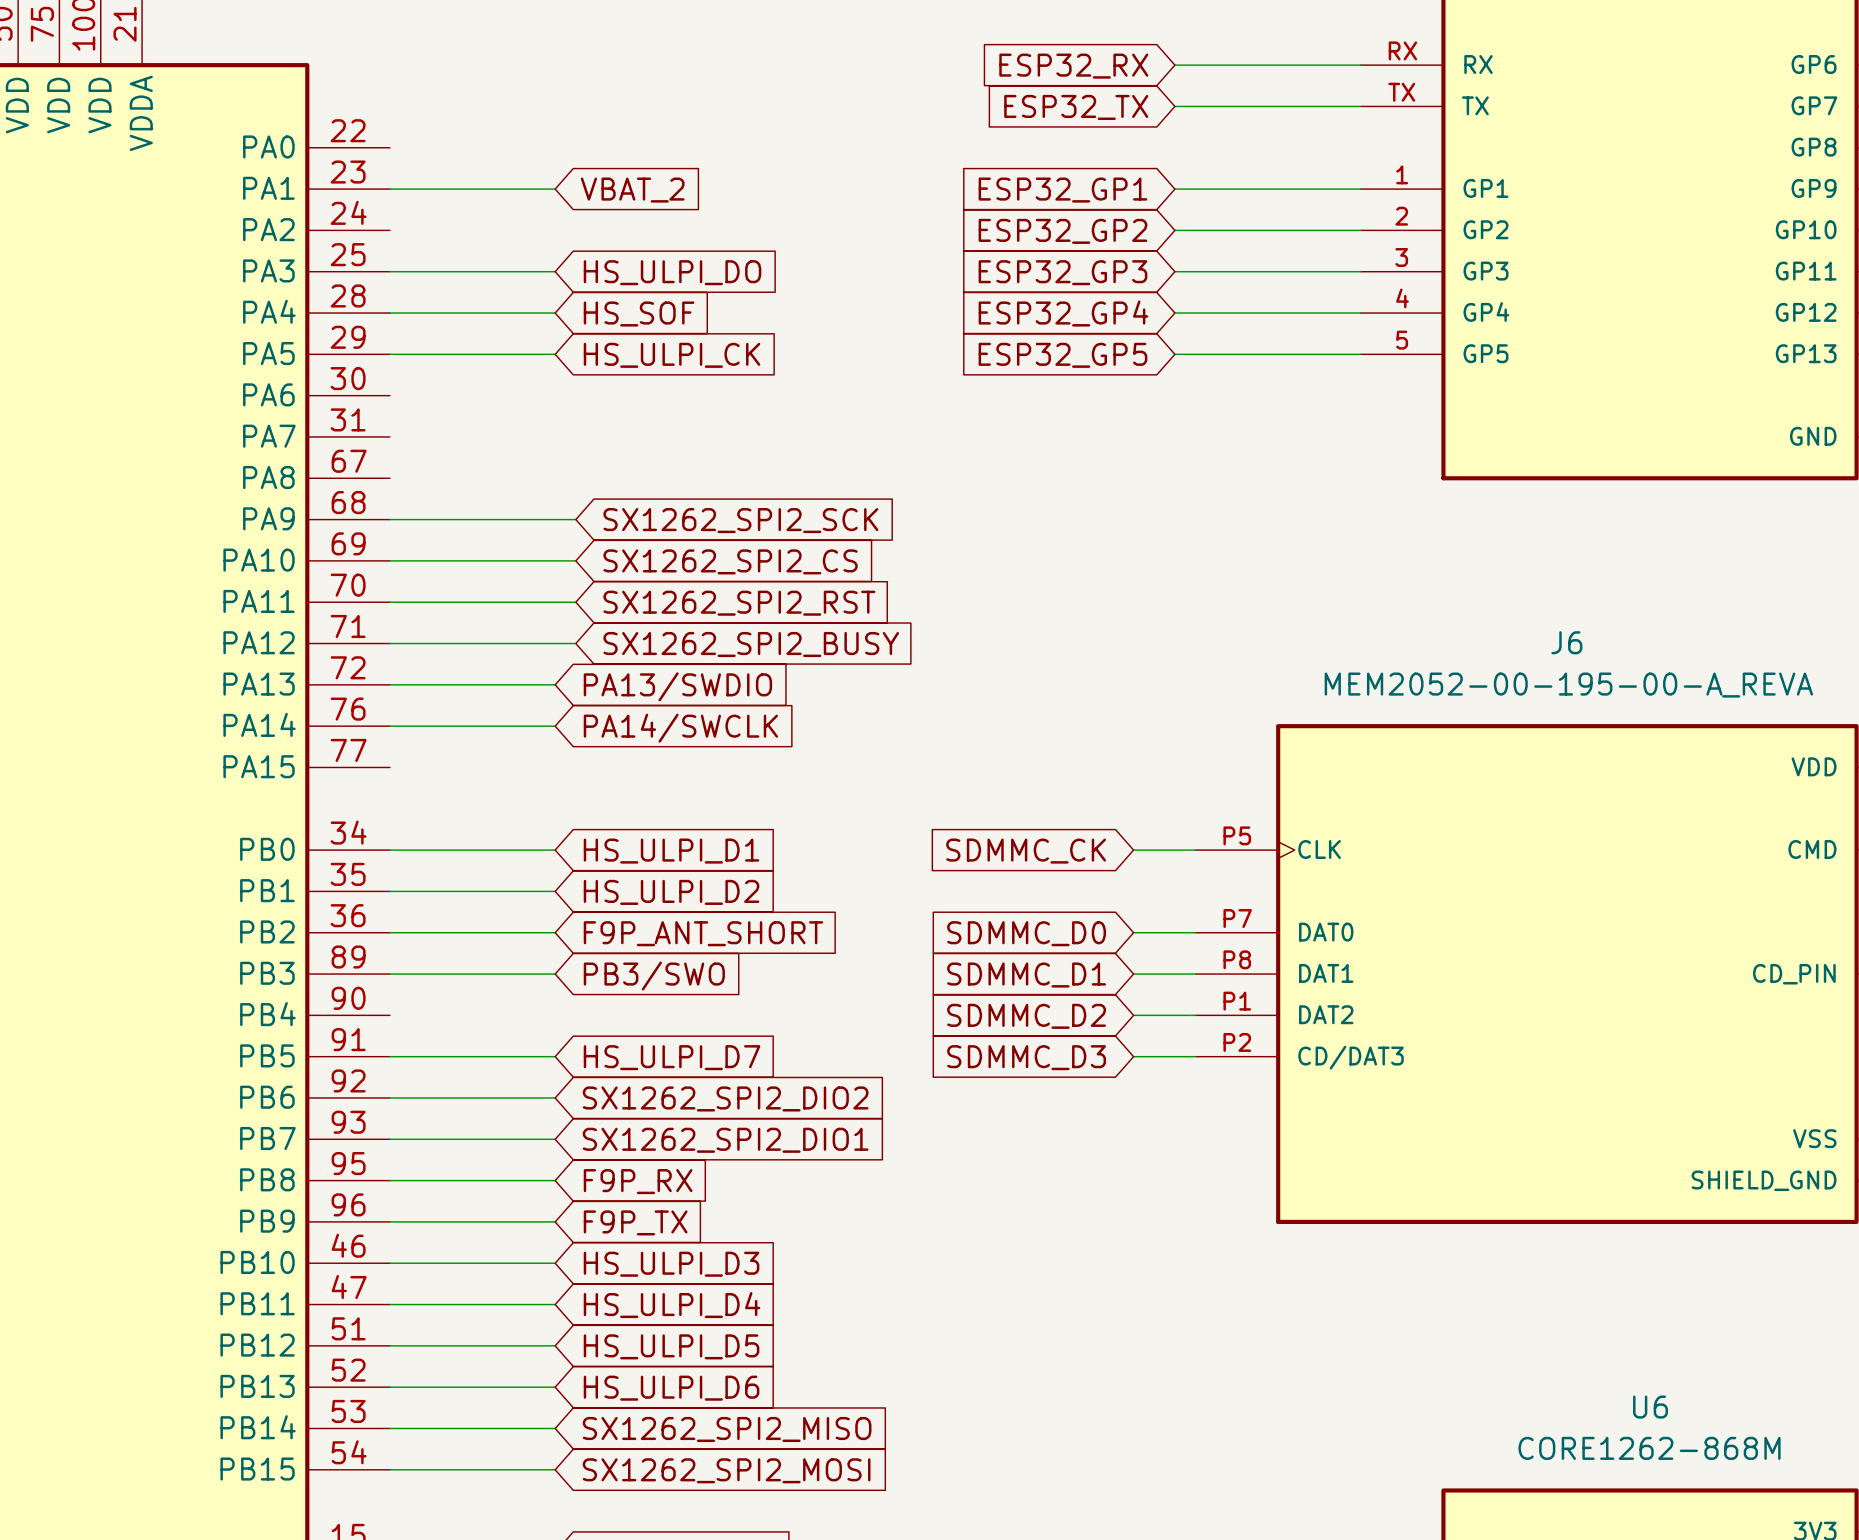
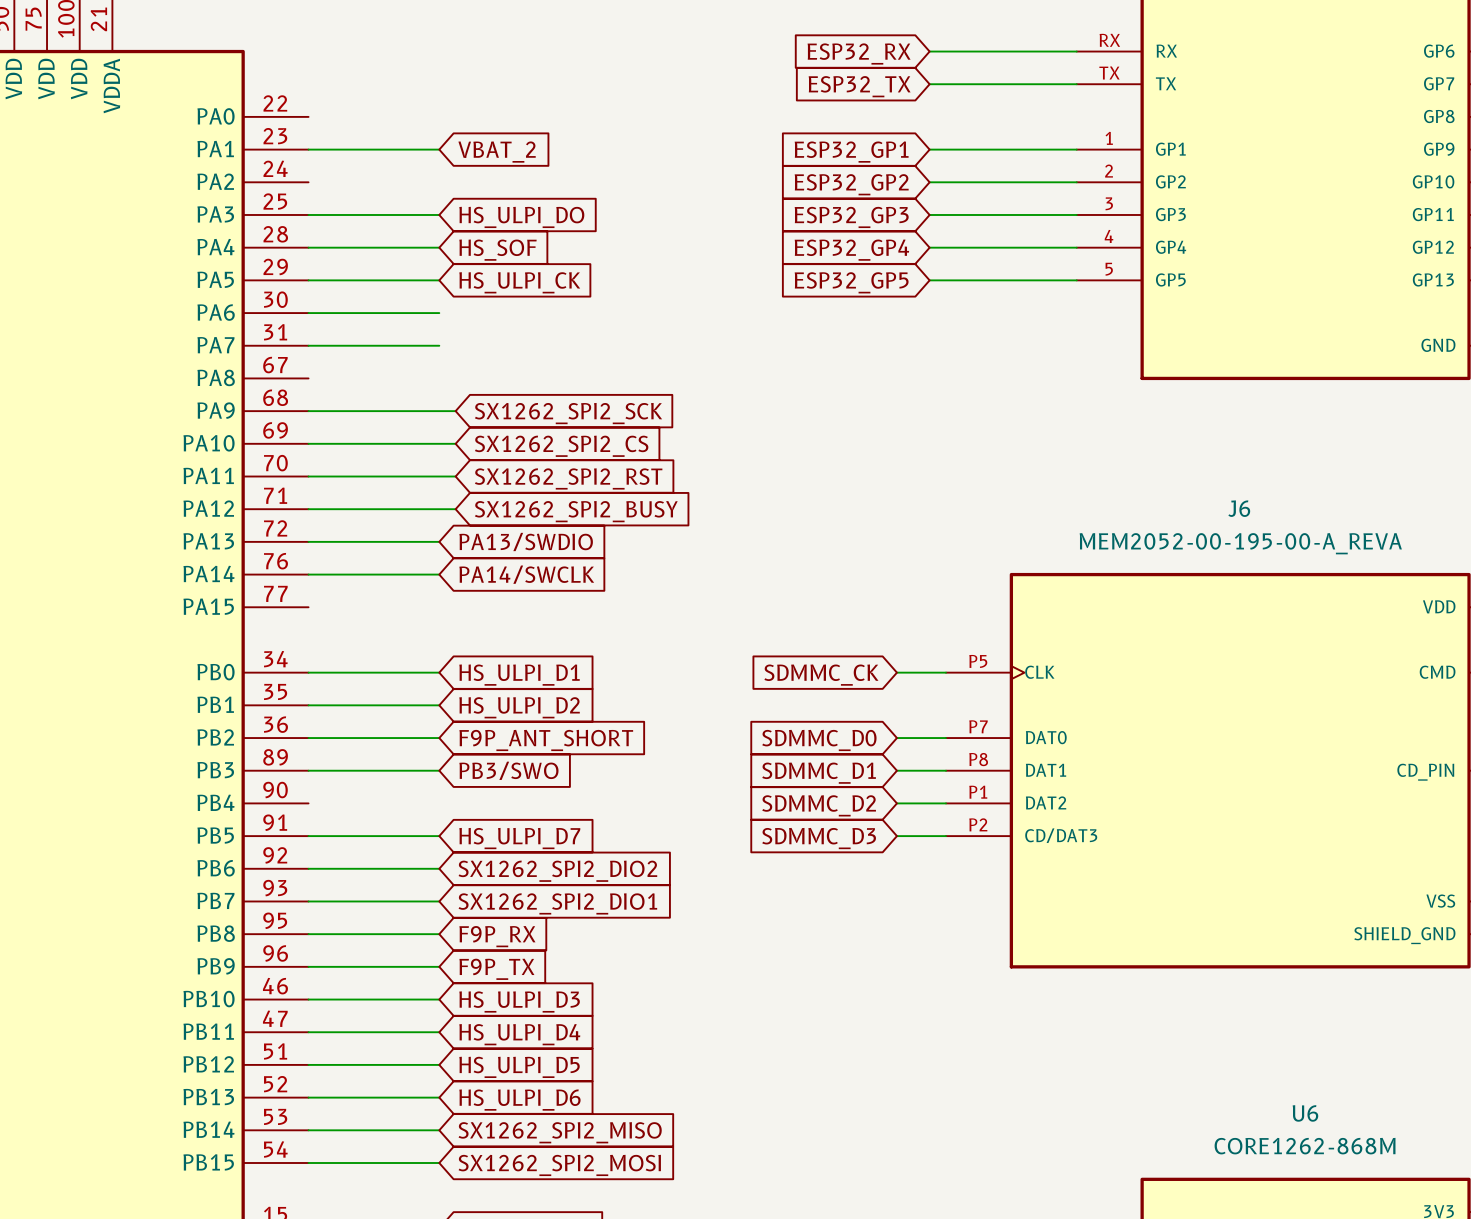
wire: none -> (308, 313) (439, 313)
wire: none -> (308, 345) (439, 345)

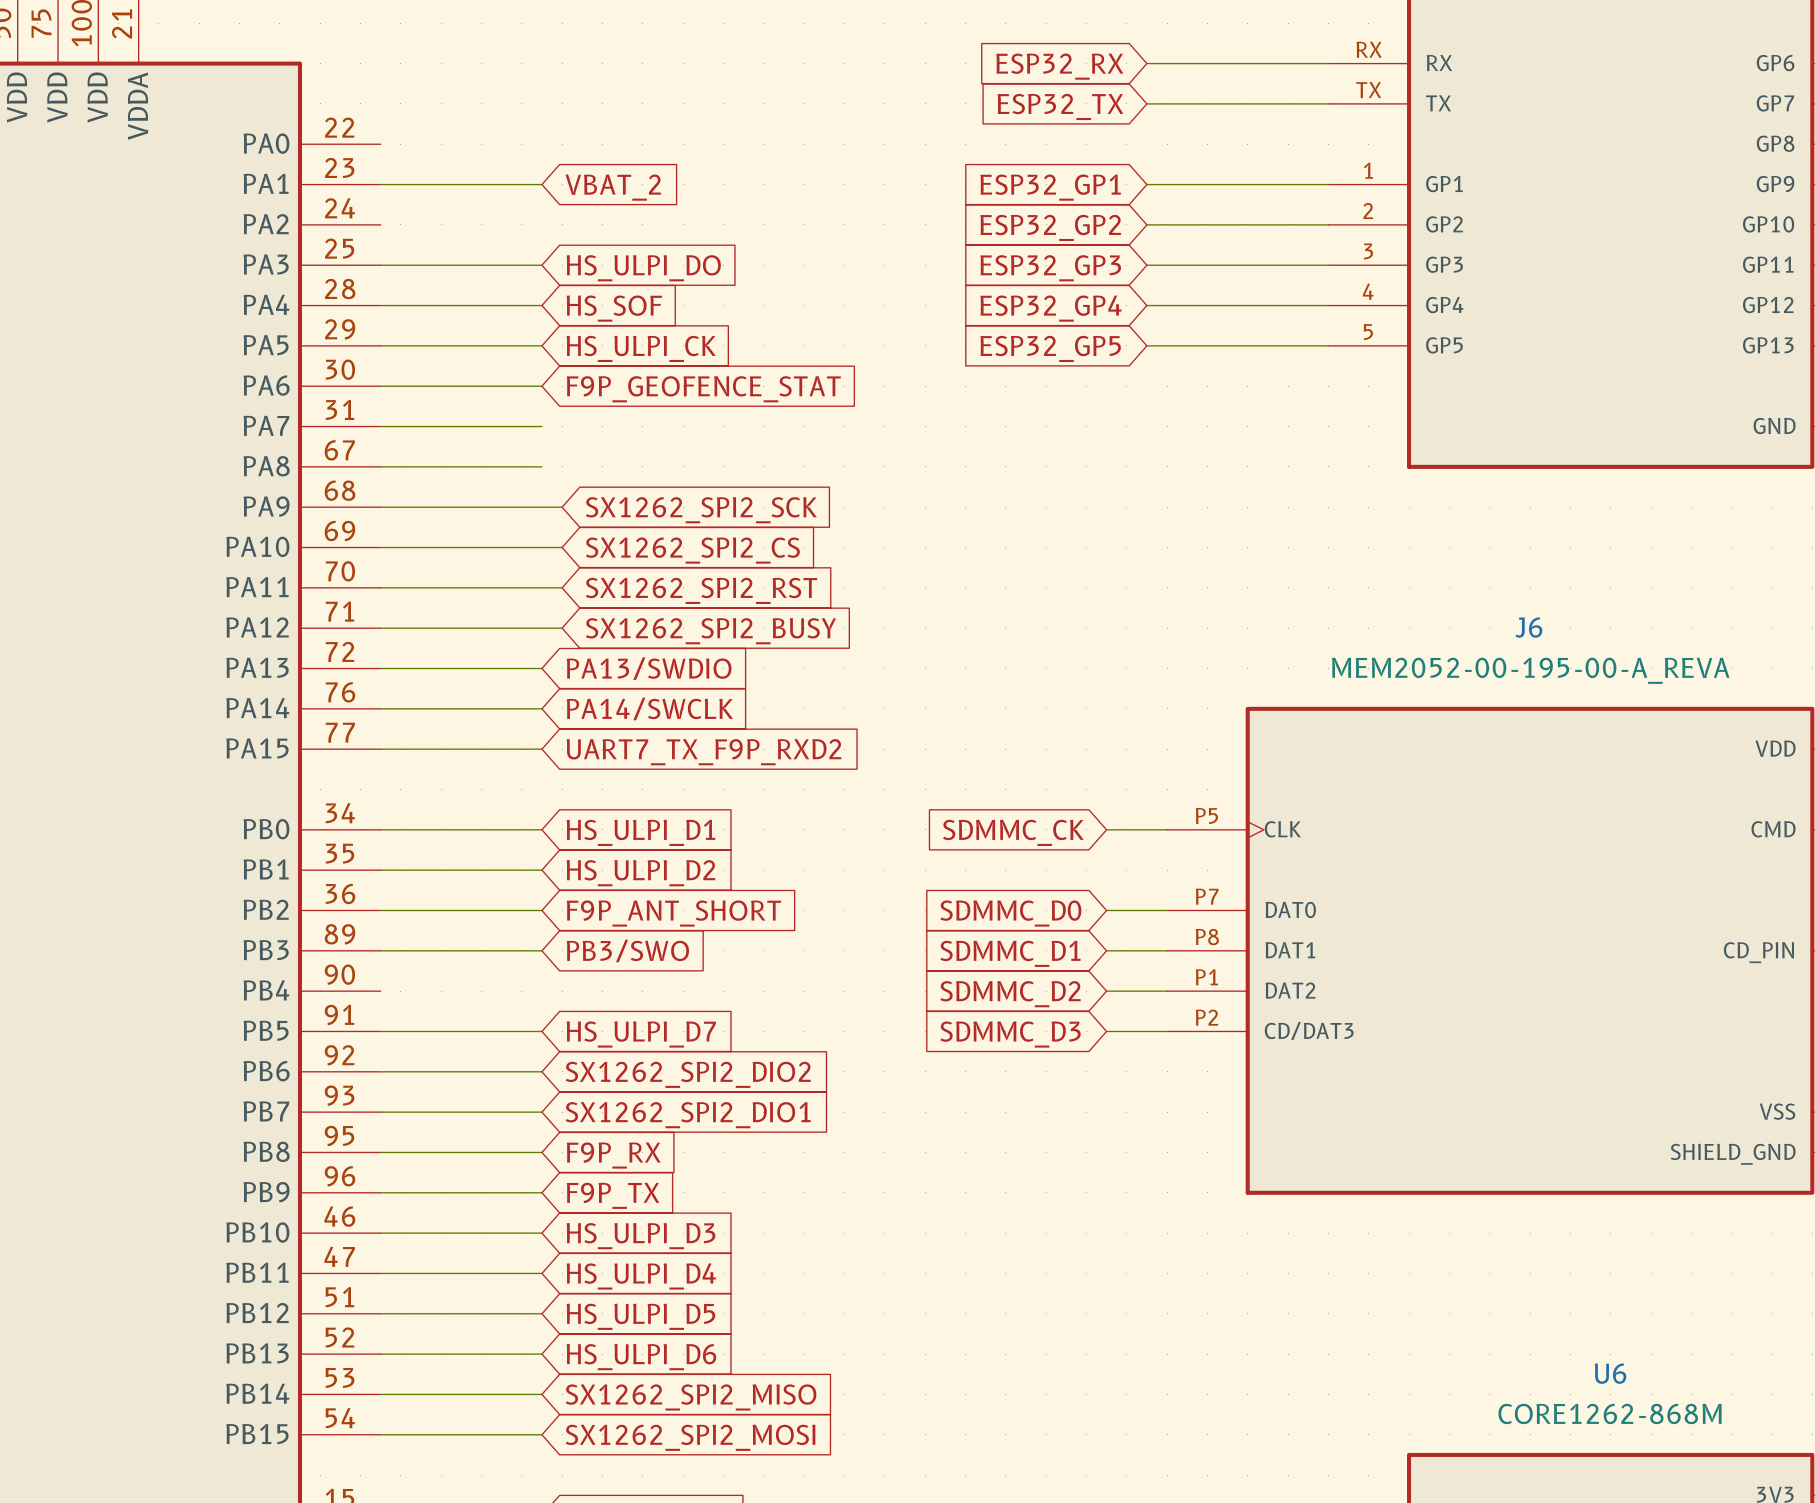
global label: none -> F9P_GEOFENCE_STAT (703, 389)
wire: none -> (380, 466) (541, 466)
wire: none -> (380, 749) (541, 749)
global label: none -> UART7_TX_F9P_RXD2 (703, 752)

